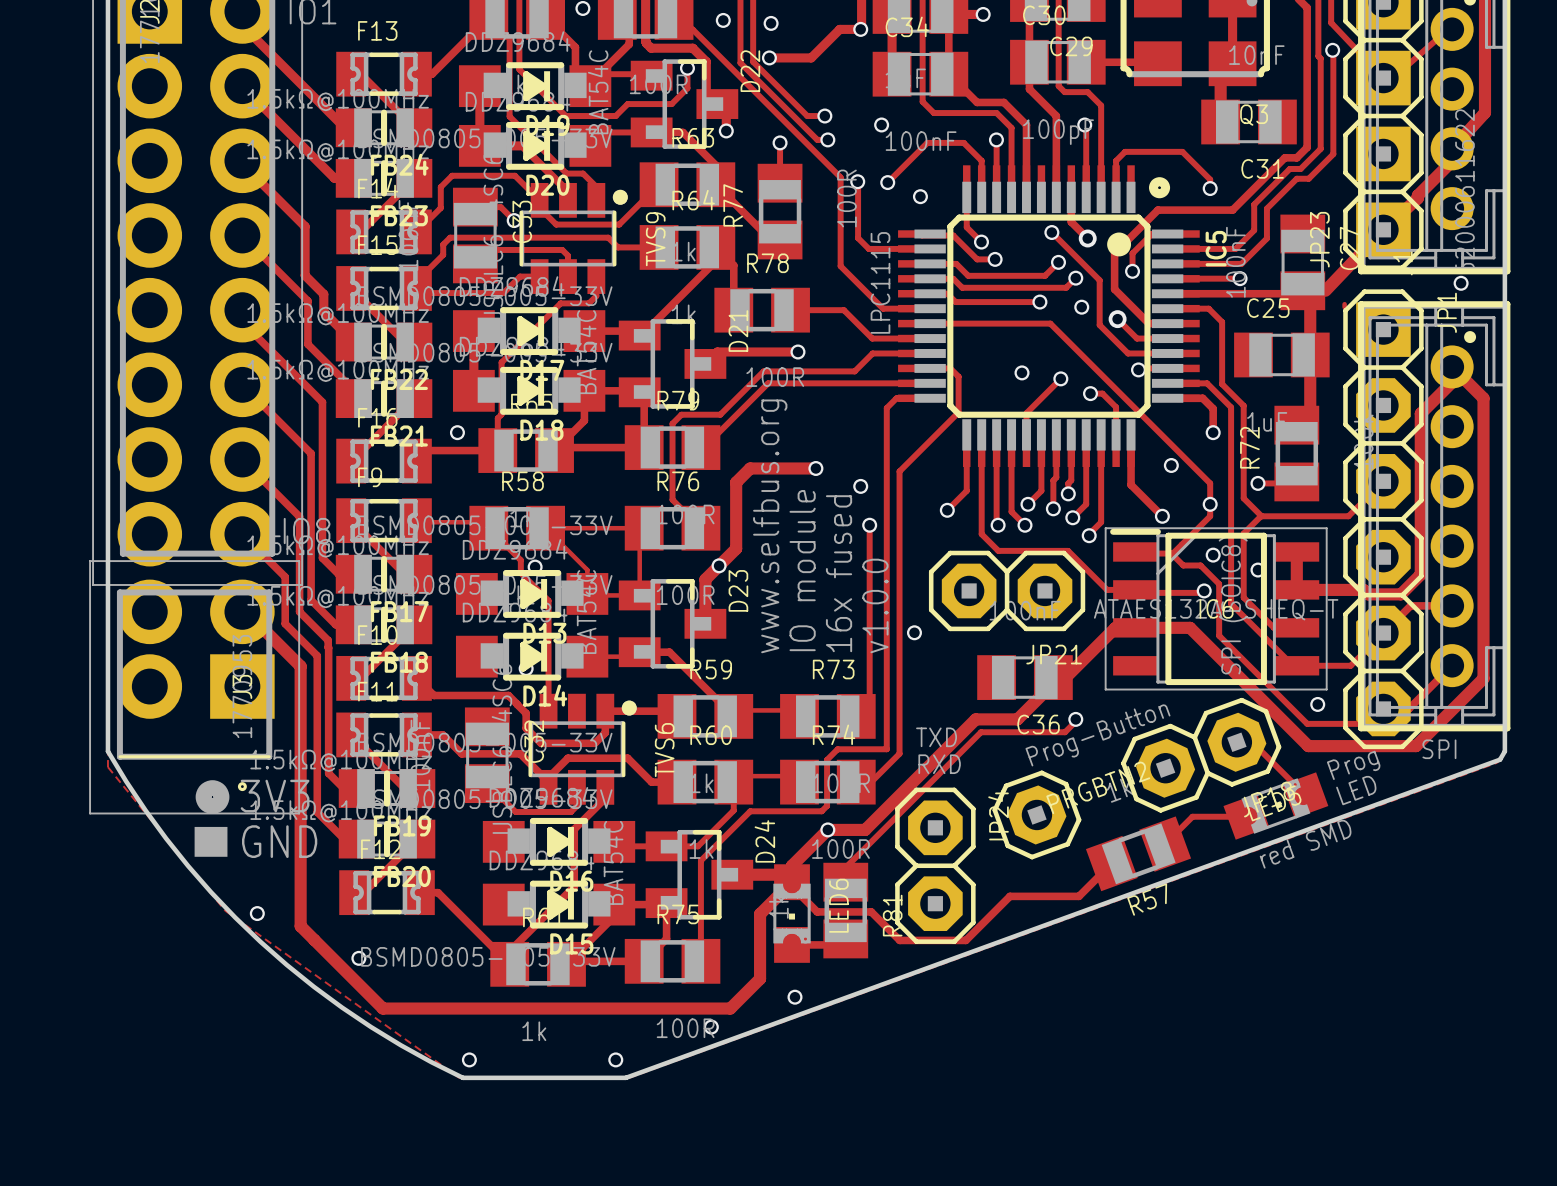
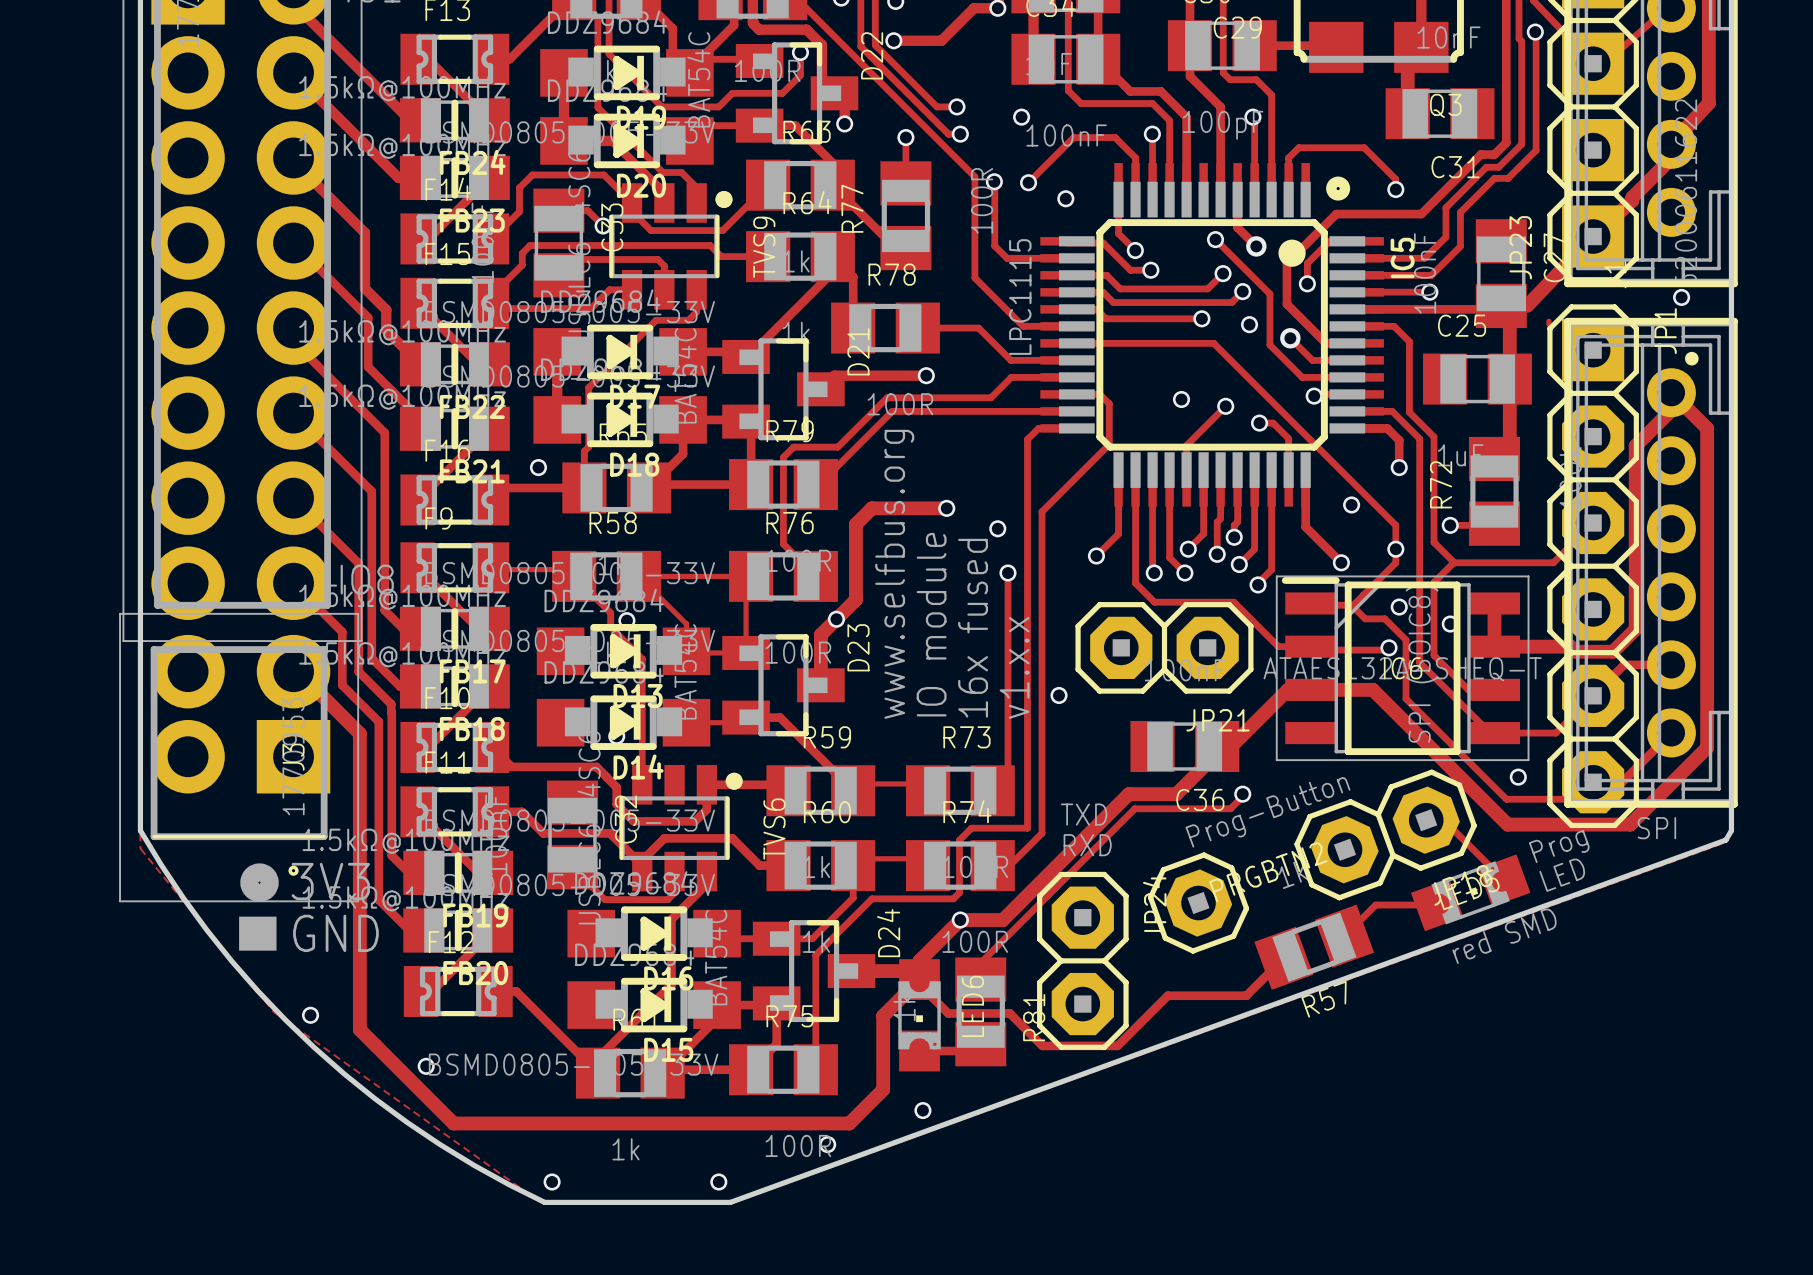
text: v1.0.0 (875, 605) -> v1.x.x (1014, 667)

